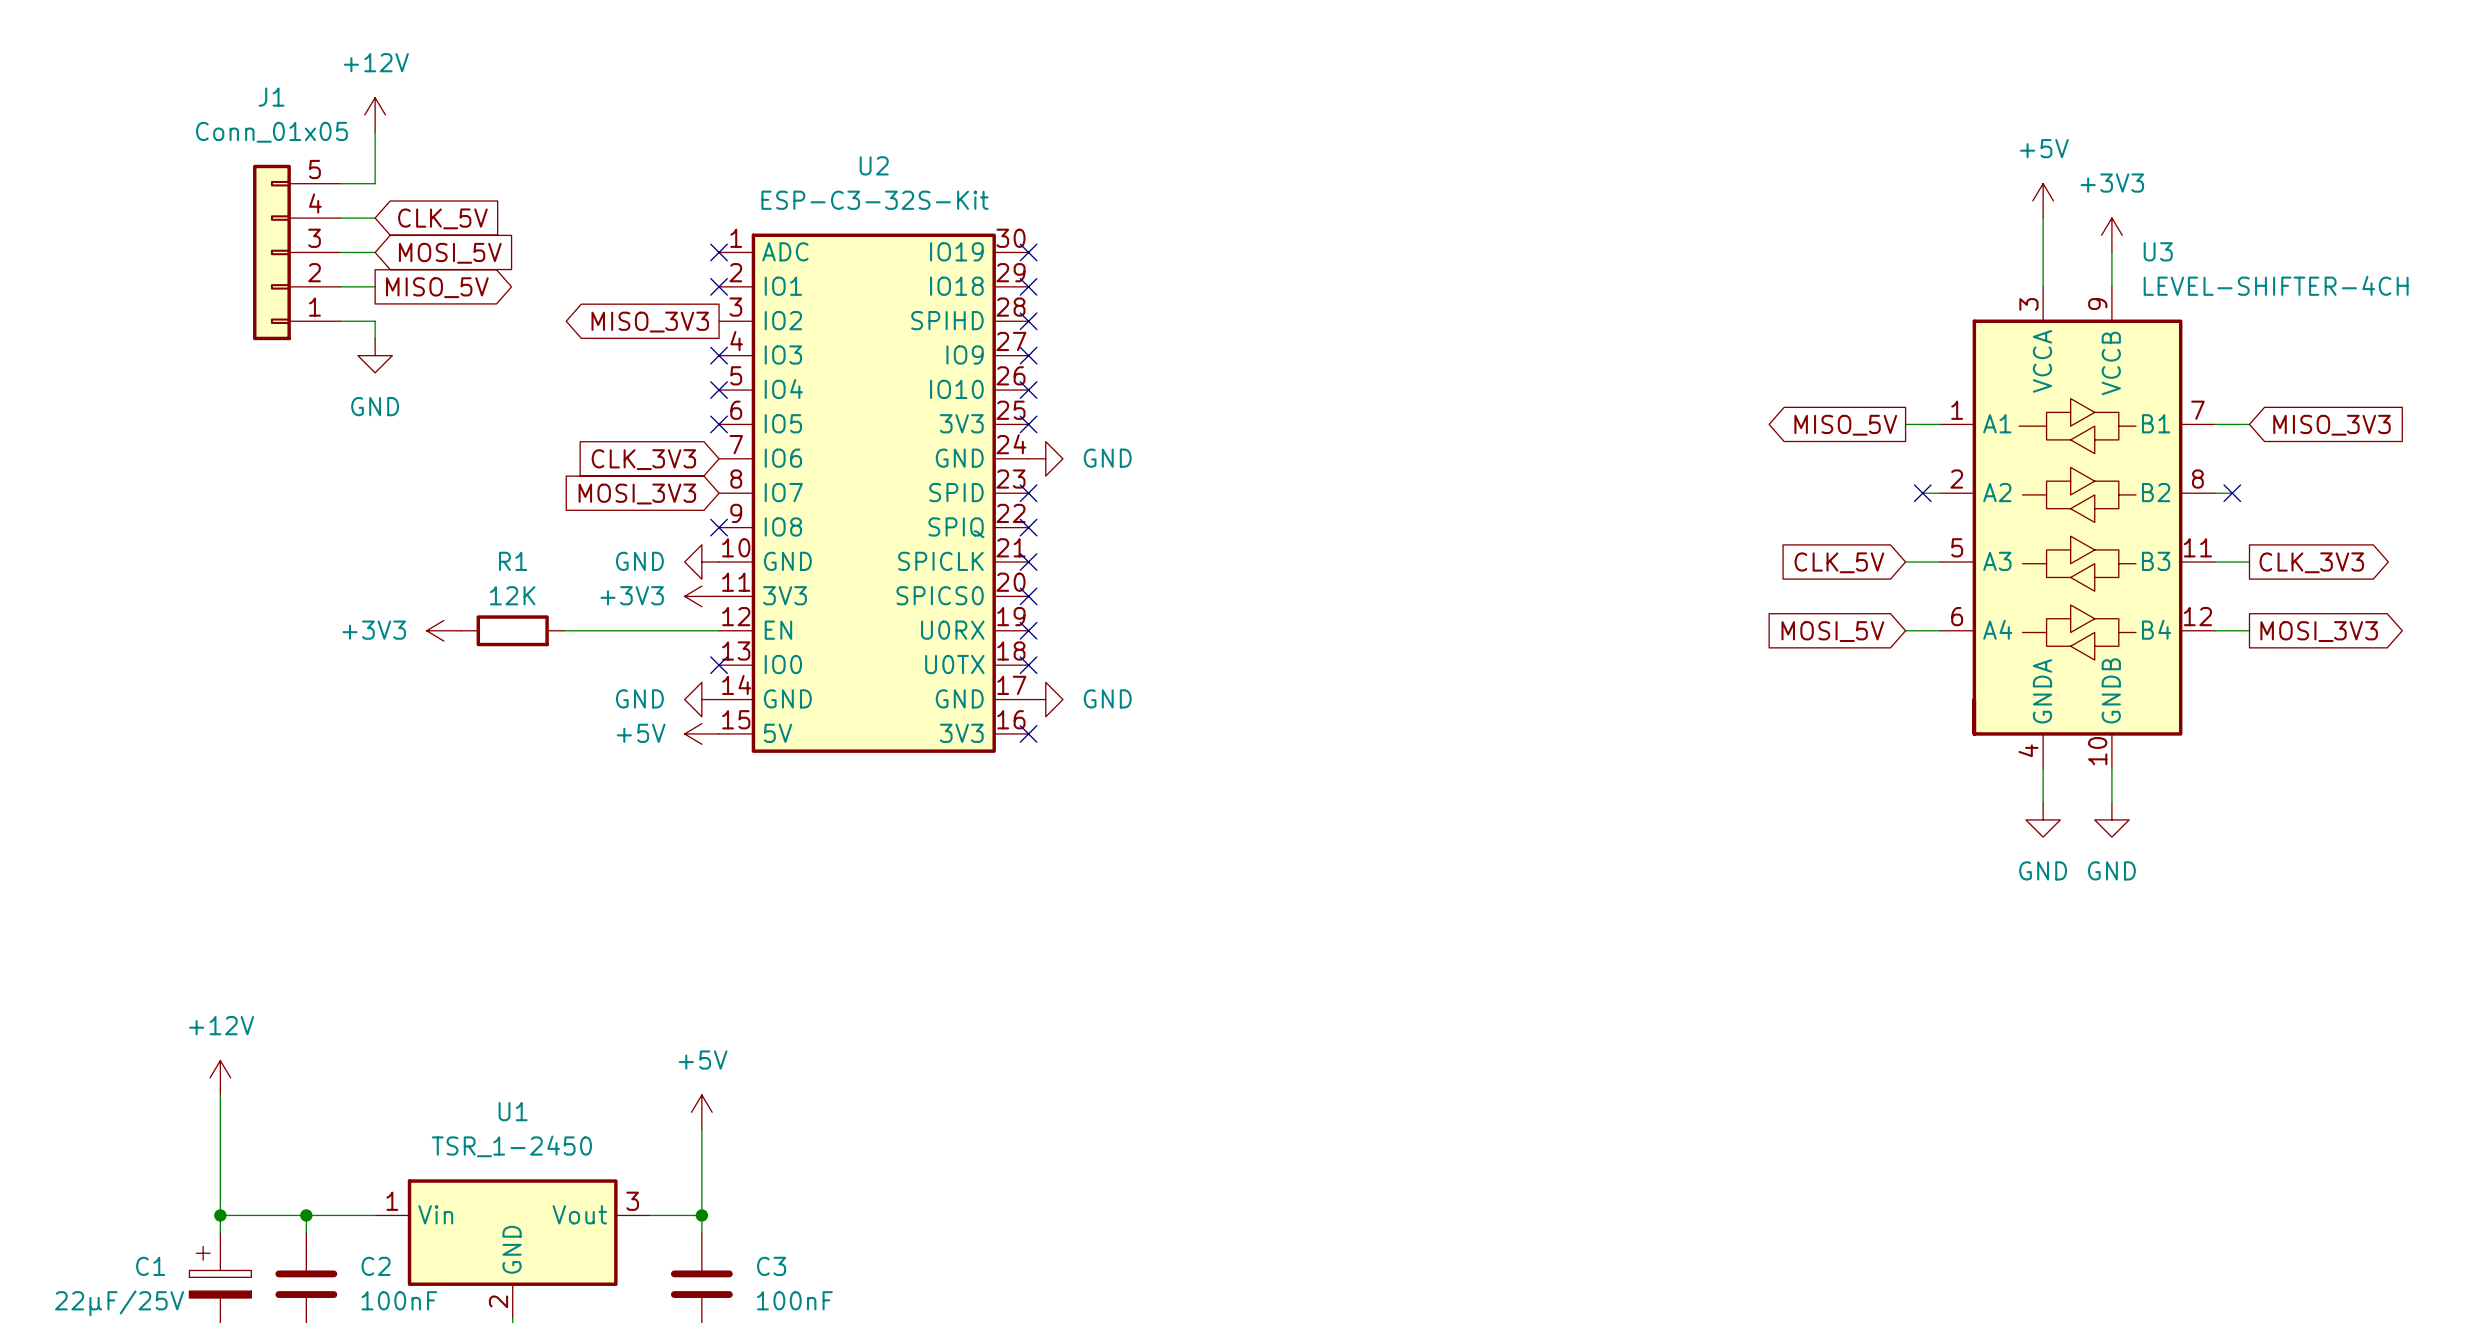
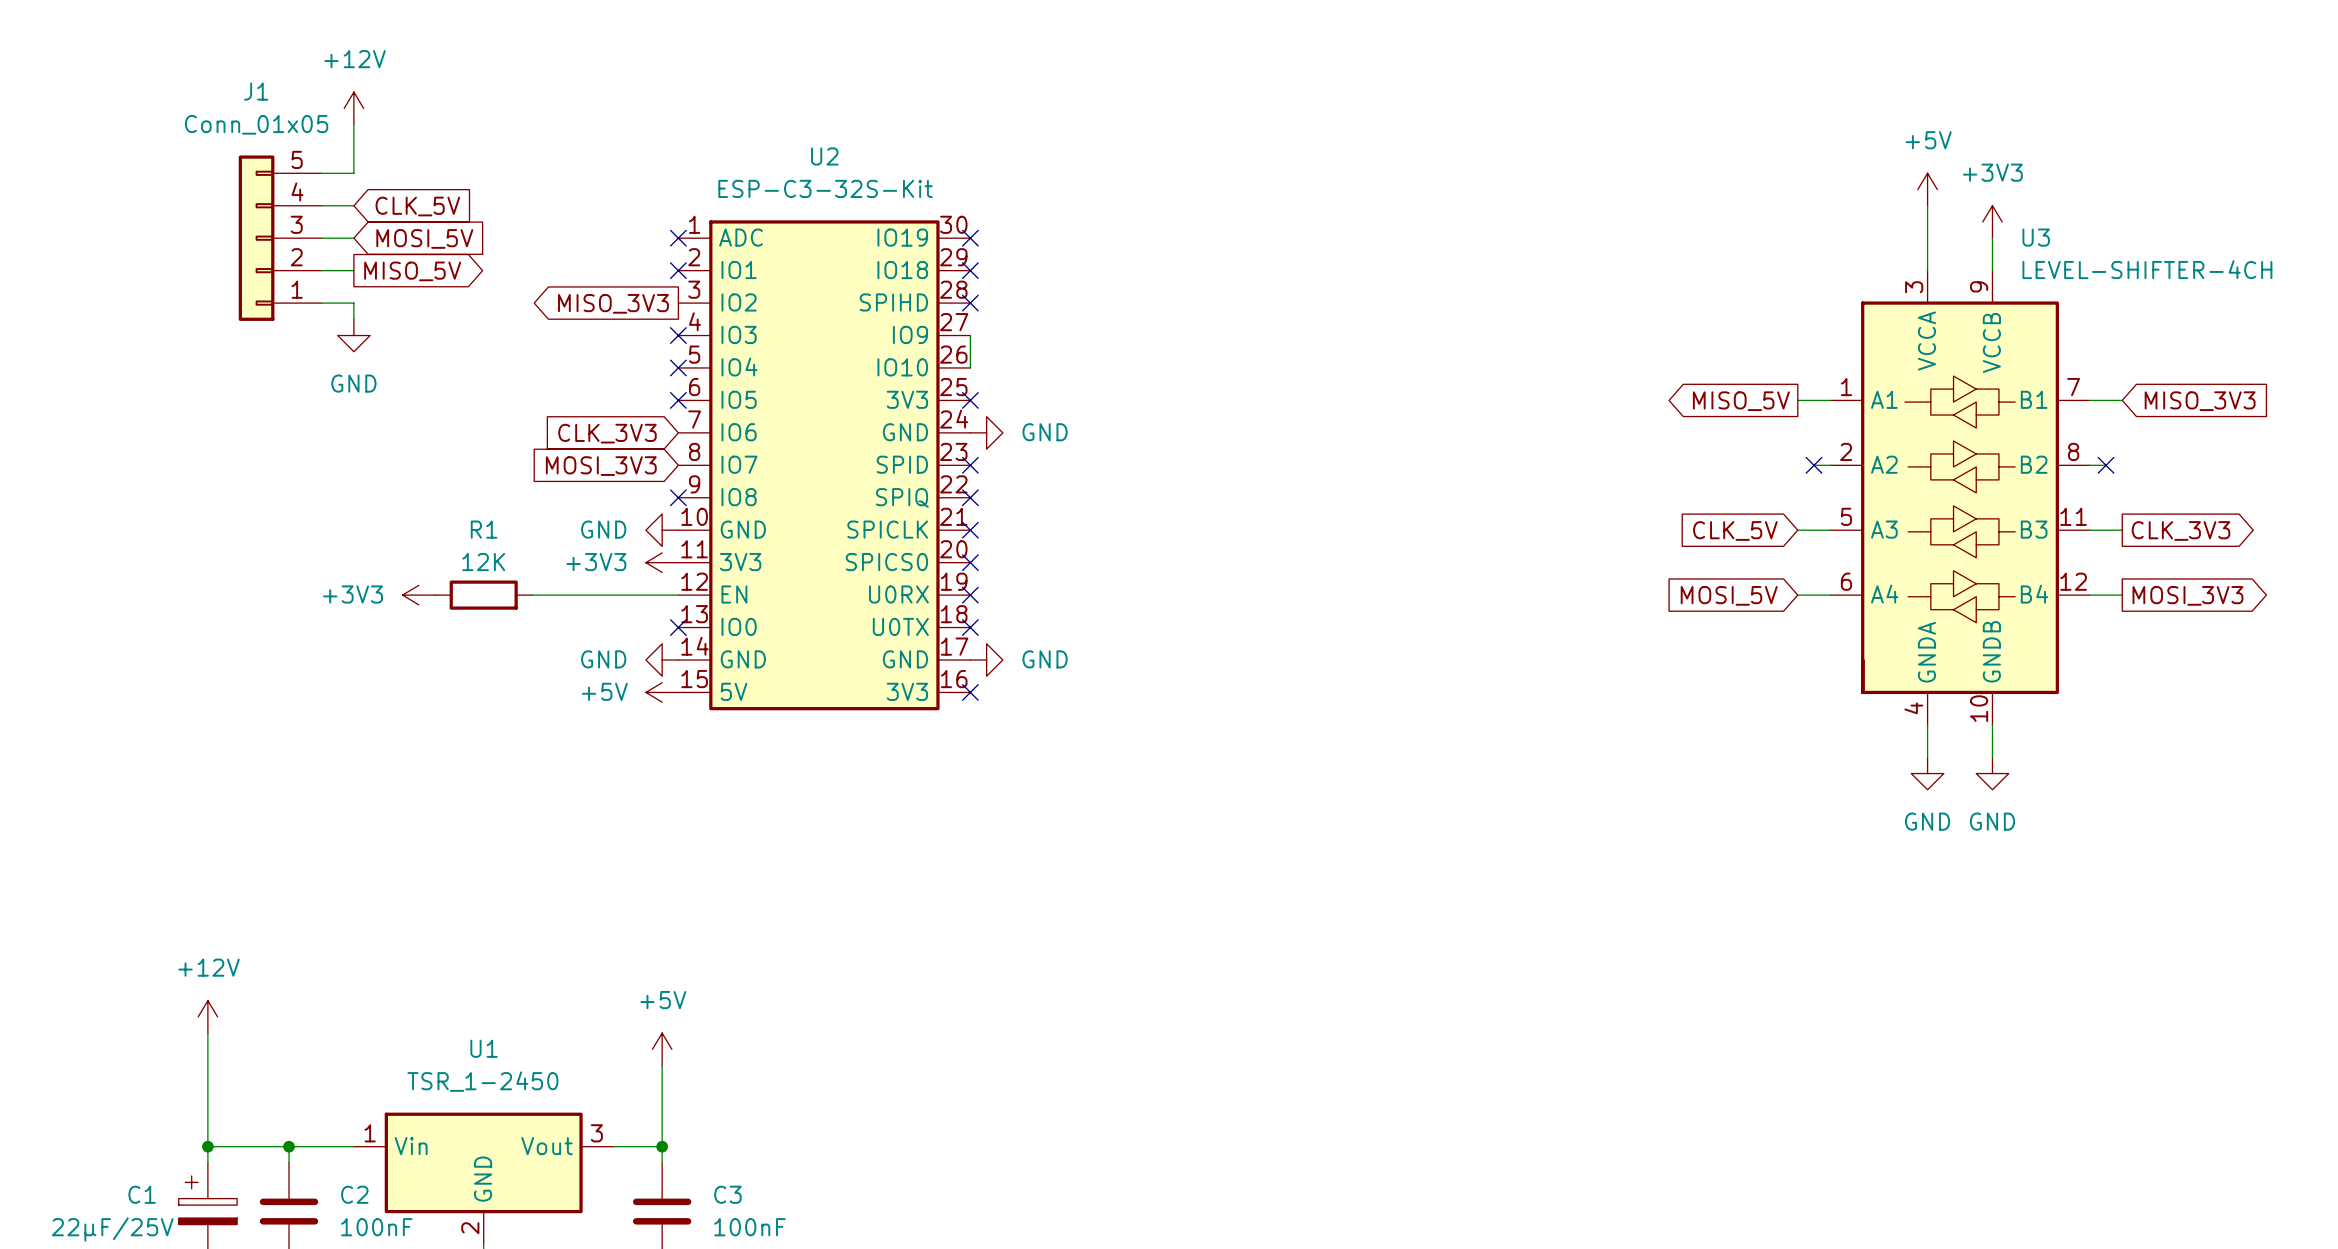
wire: none -> (970, 335) (970, 367)
no-connect mark: (1028, 355) -> none
no-connect mark: (1028, 390) -> none

